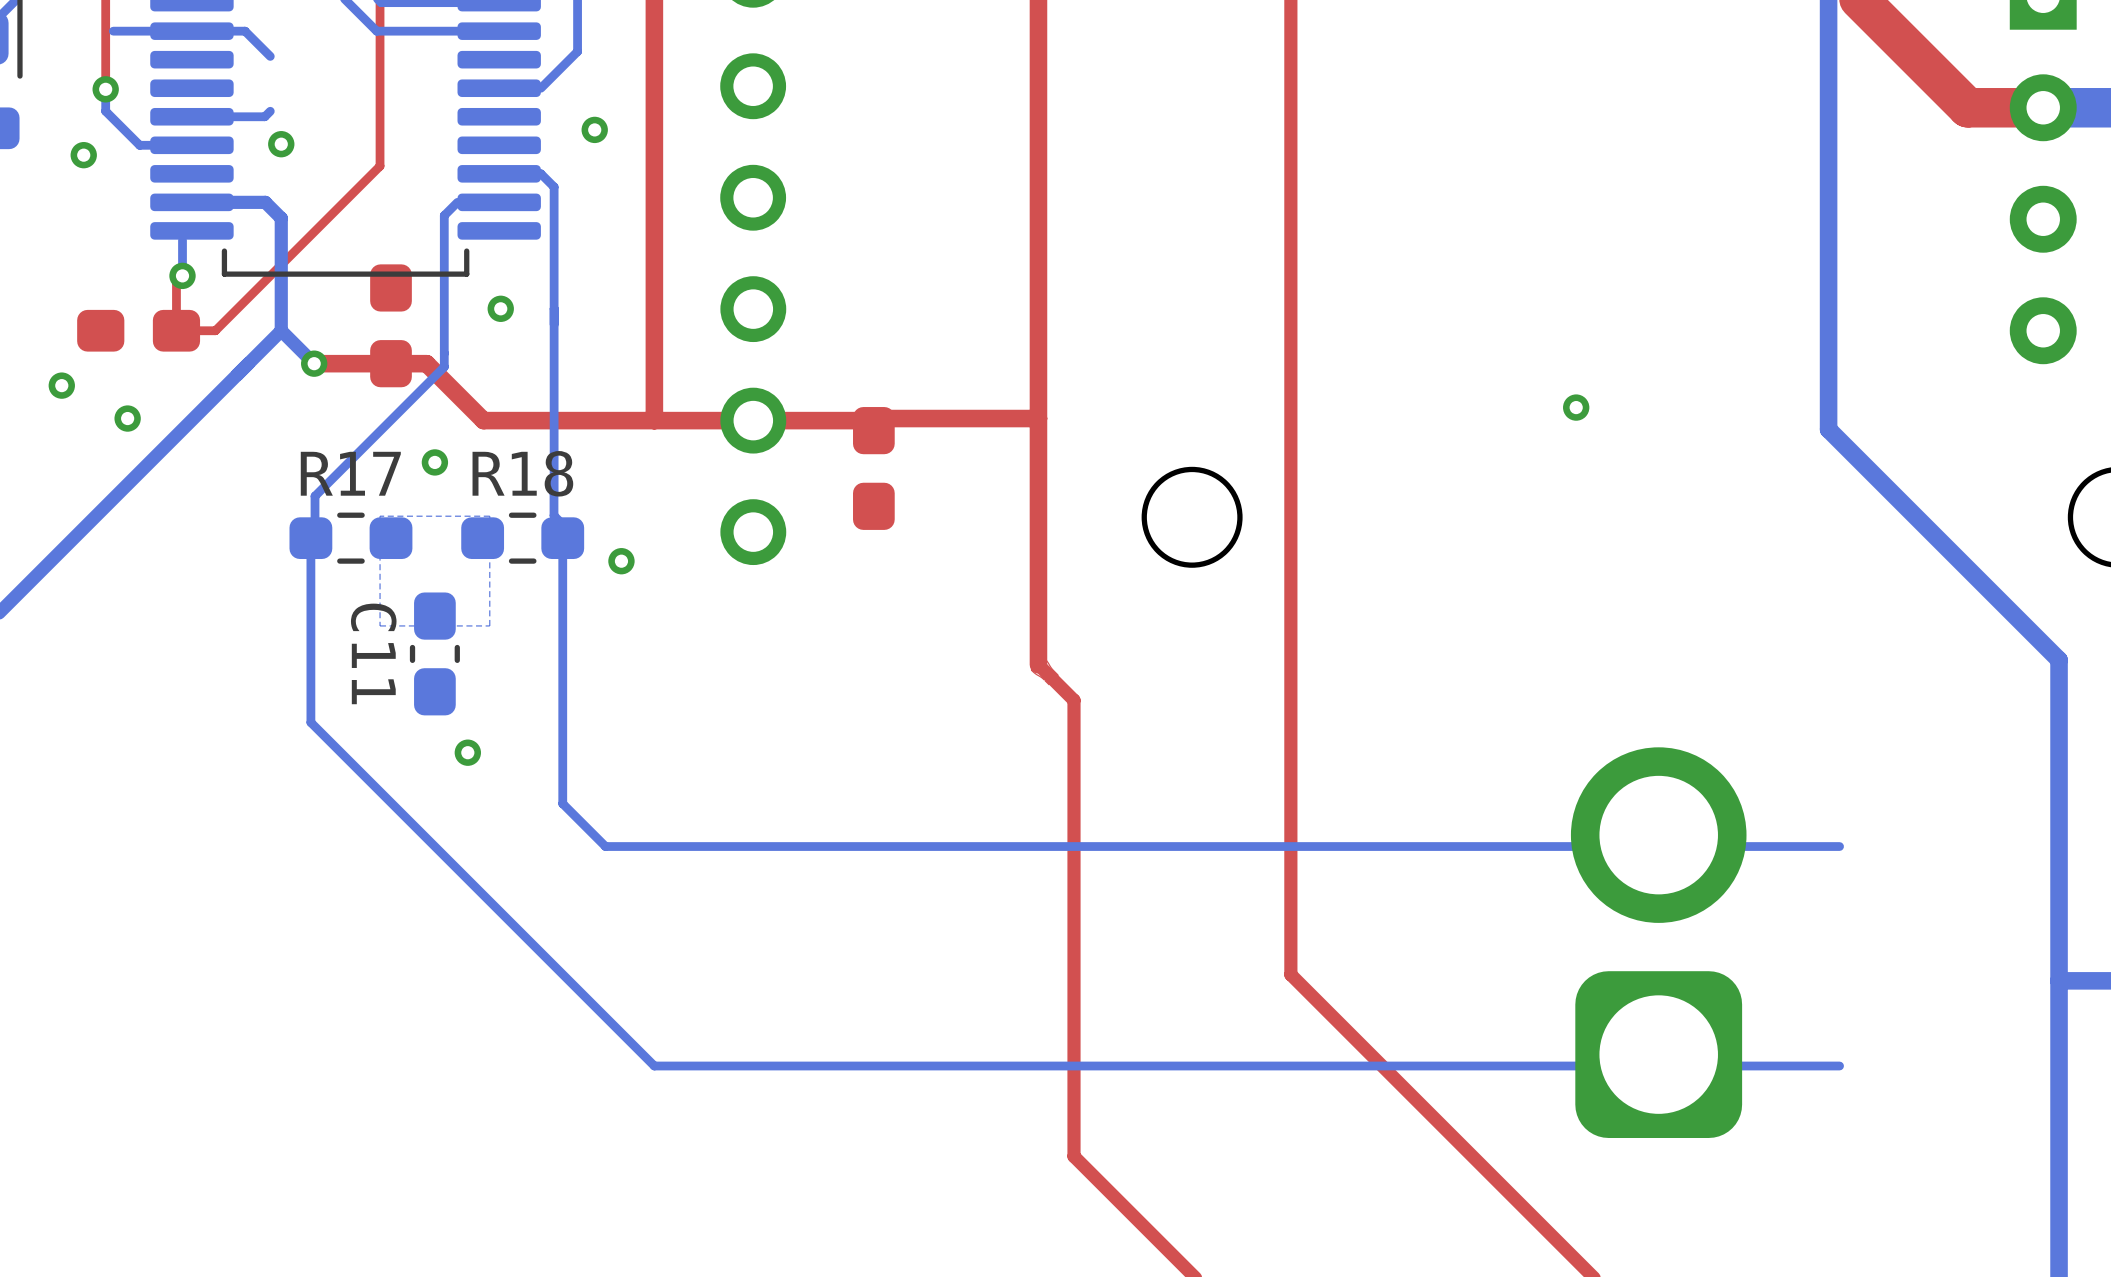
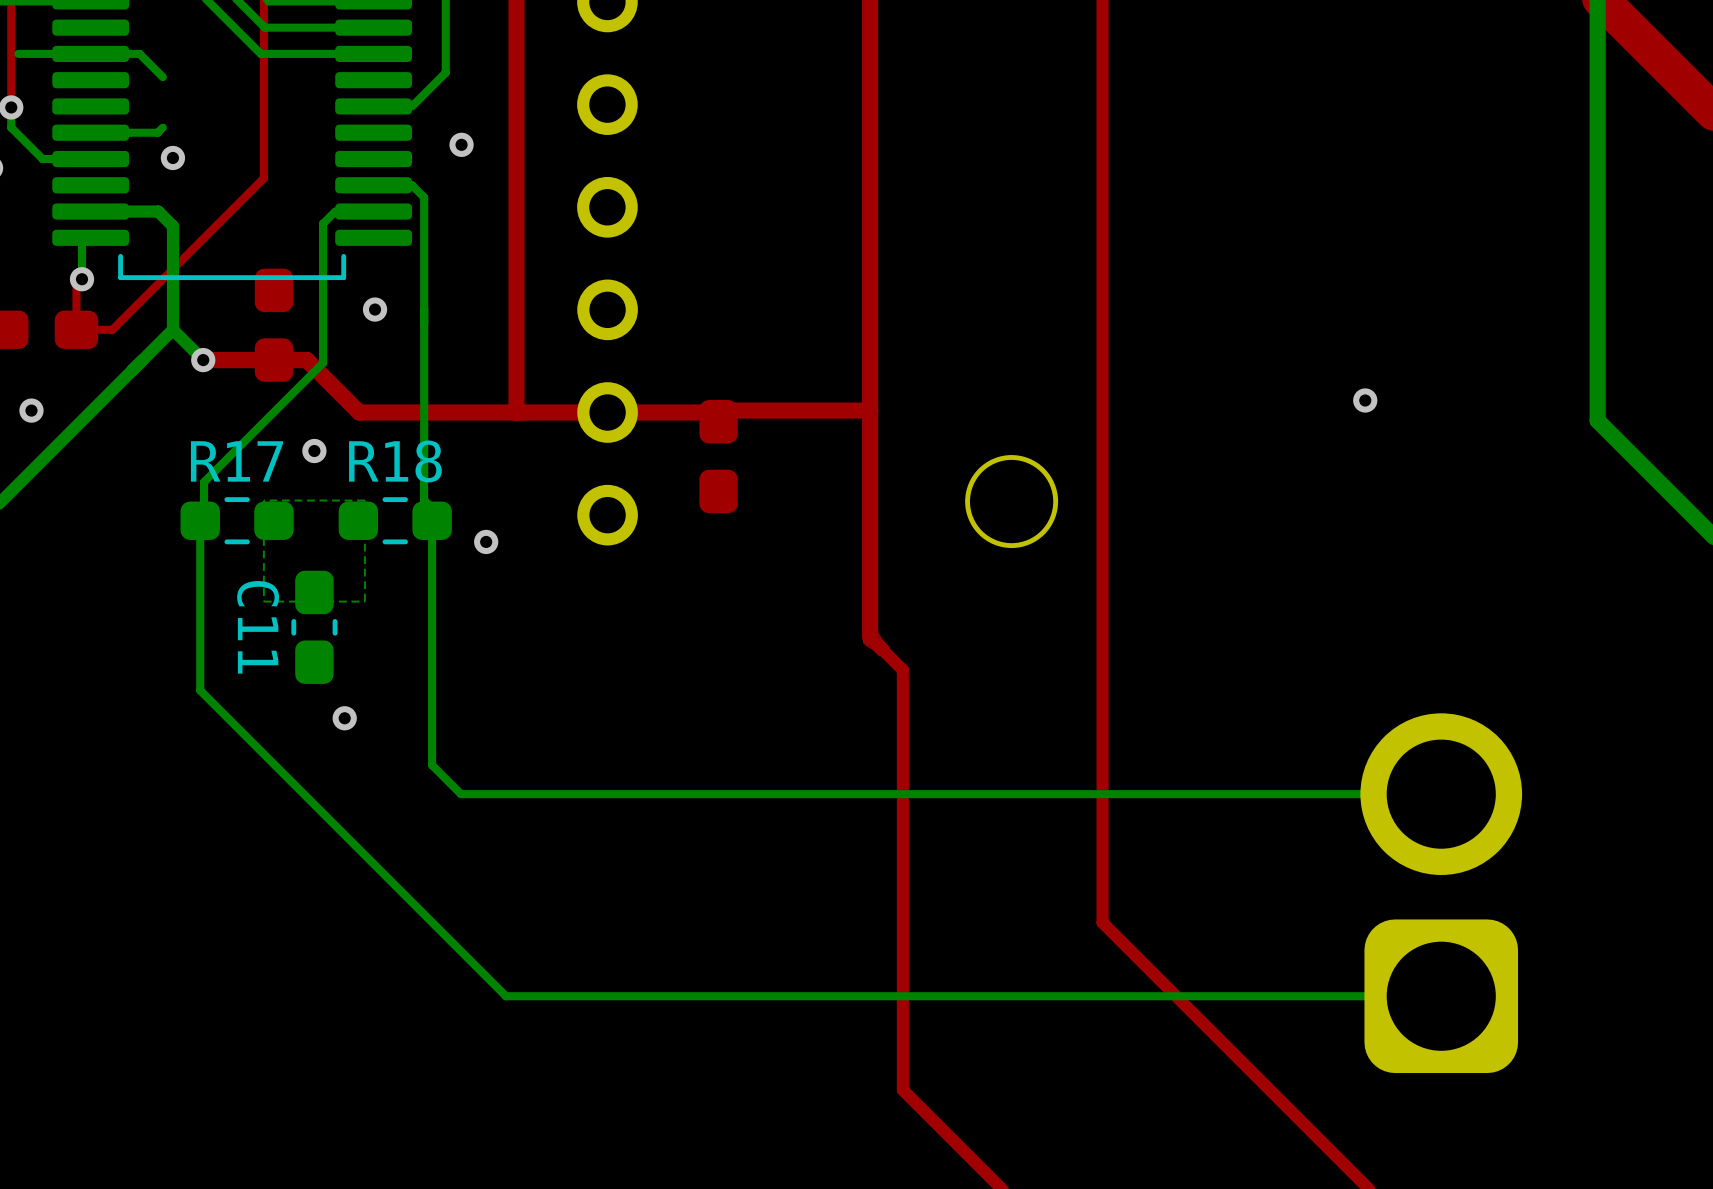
bottom track: (594, 835) (605, 846) (1839, 846) -> (461, 794) (1441, 794)
bottom track: (642, 1054) (654, 1066) (1839, 1066) -> (505, 996) (1441, 996)

